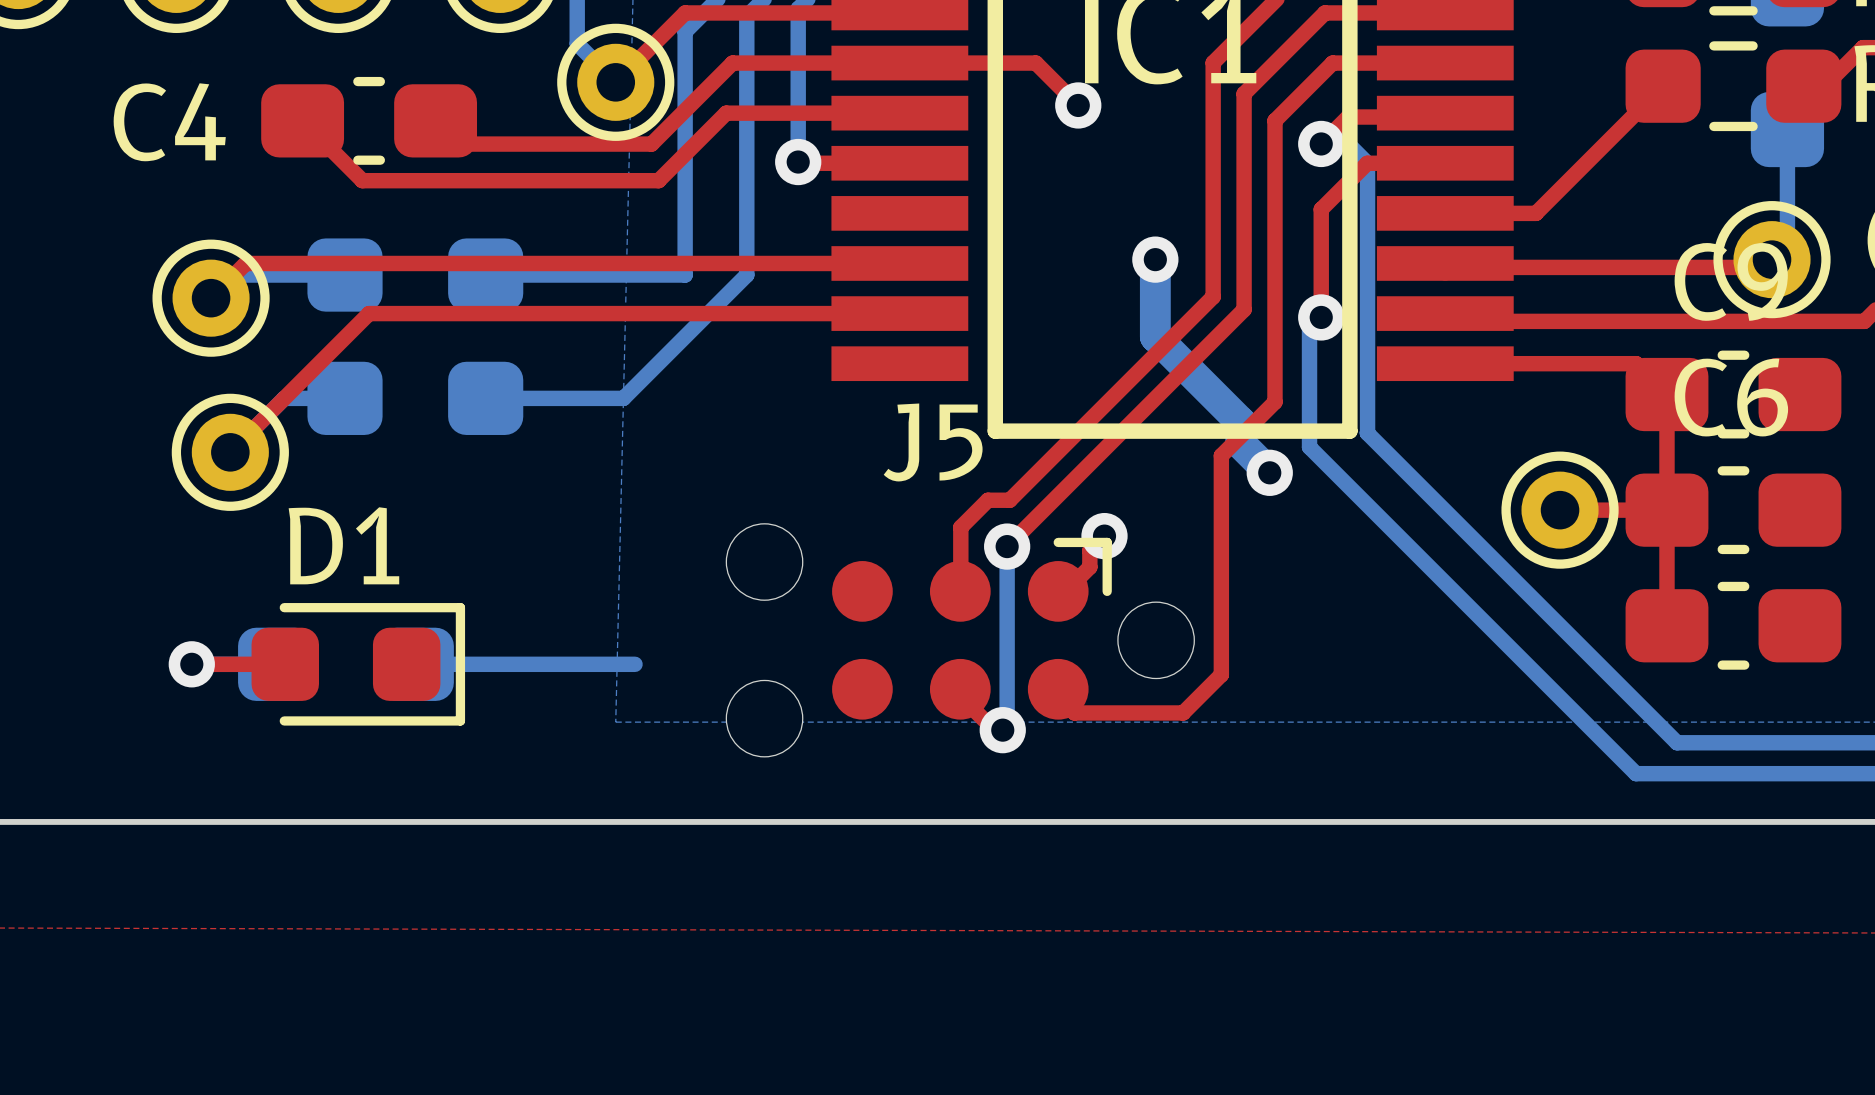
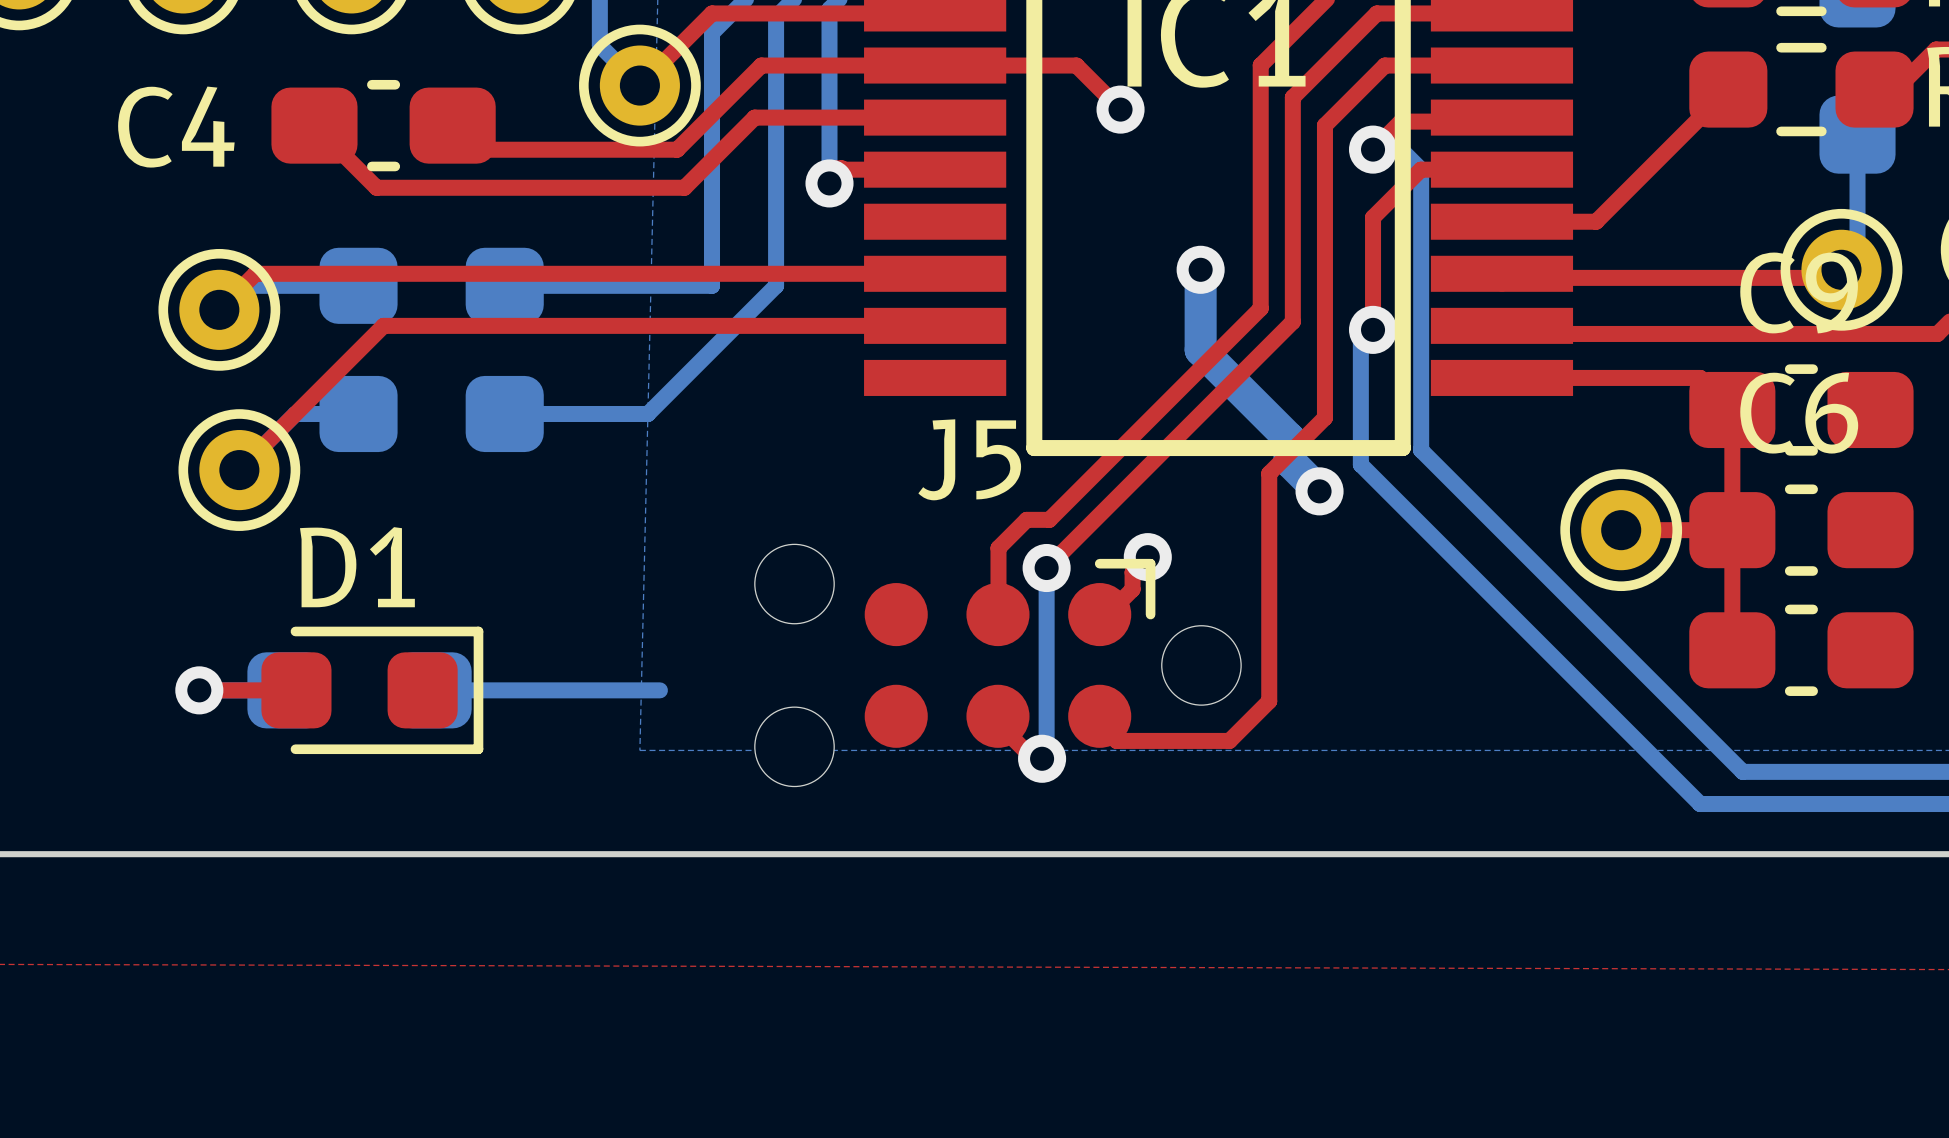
via position: (798, 162) -> (829, 183)

